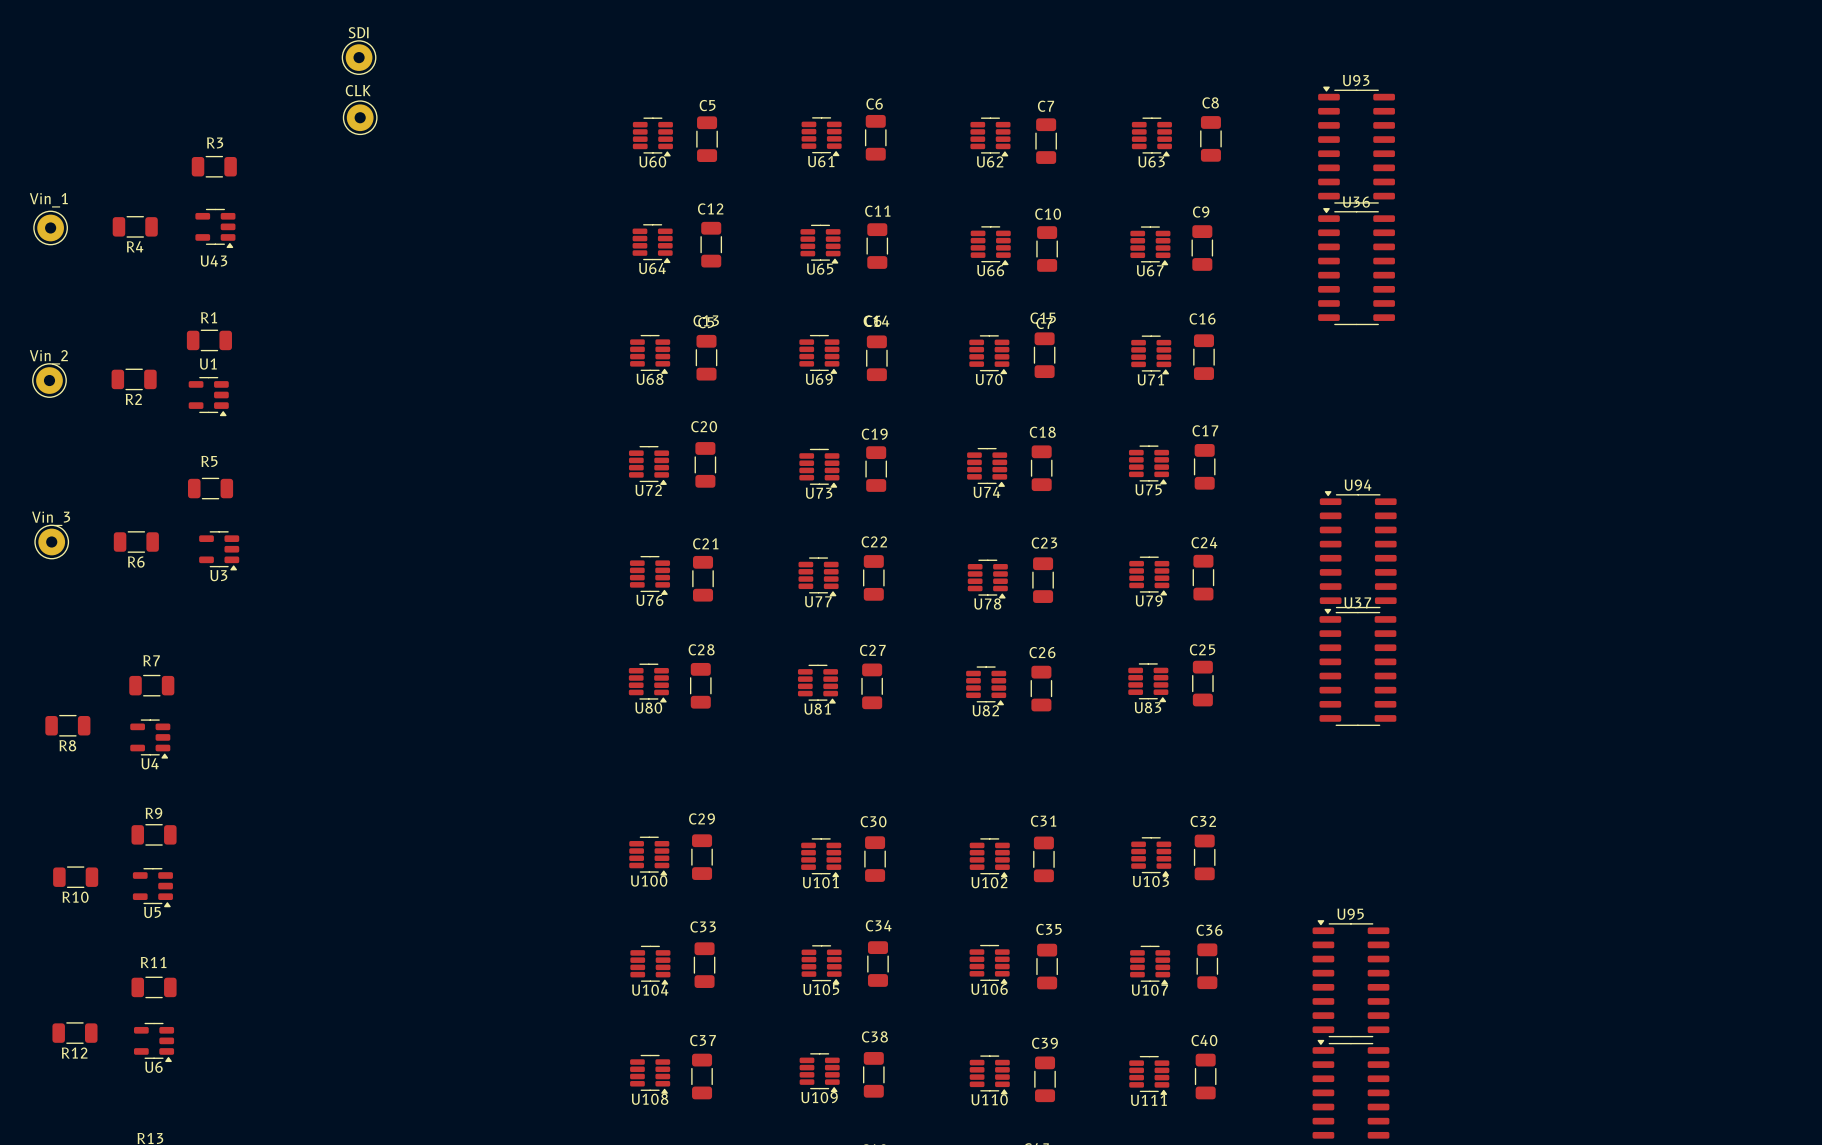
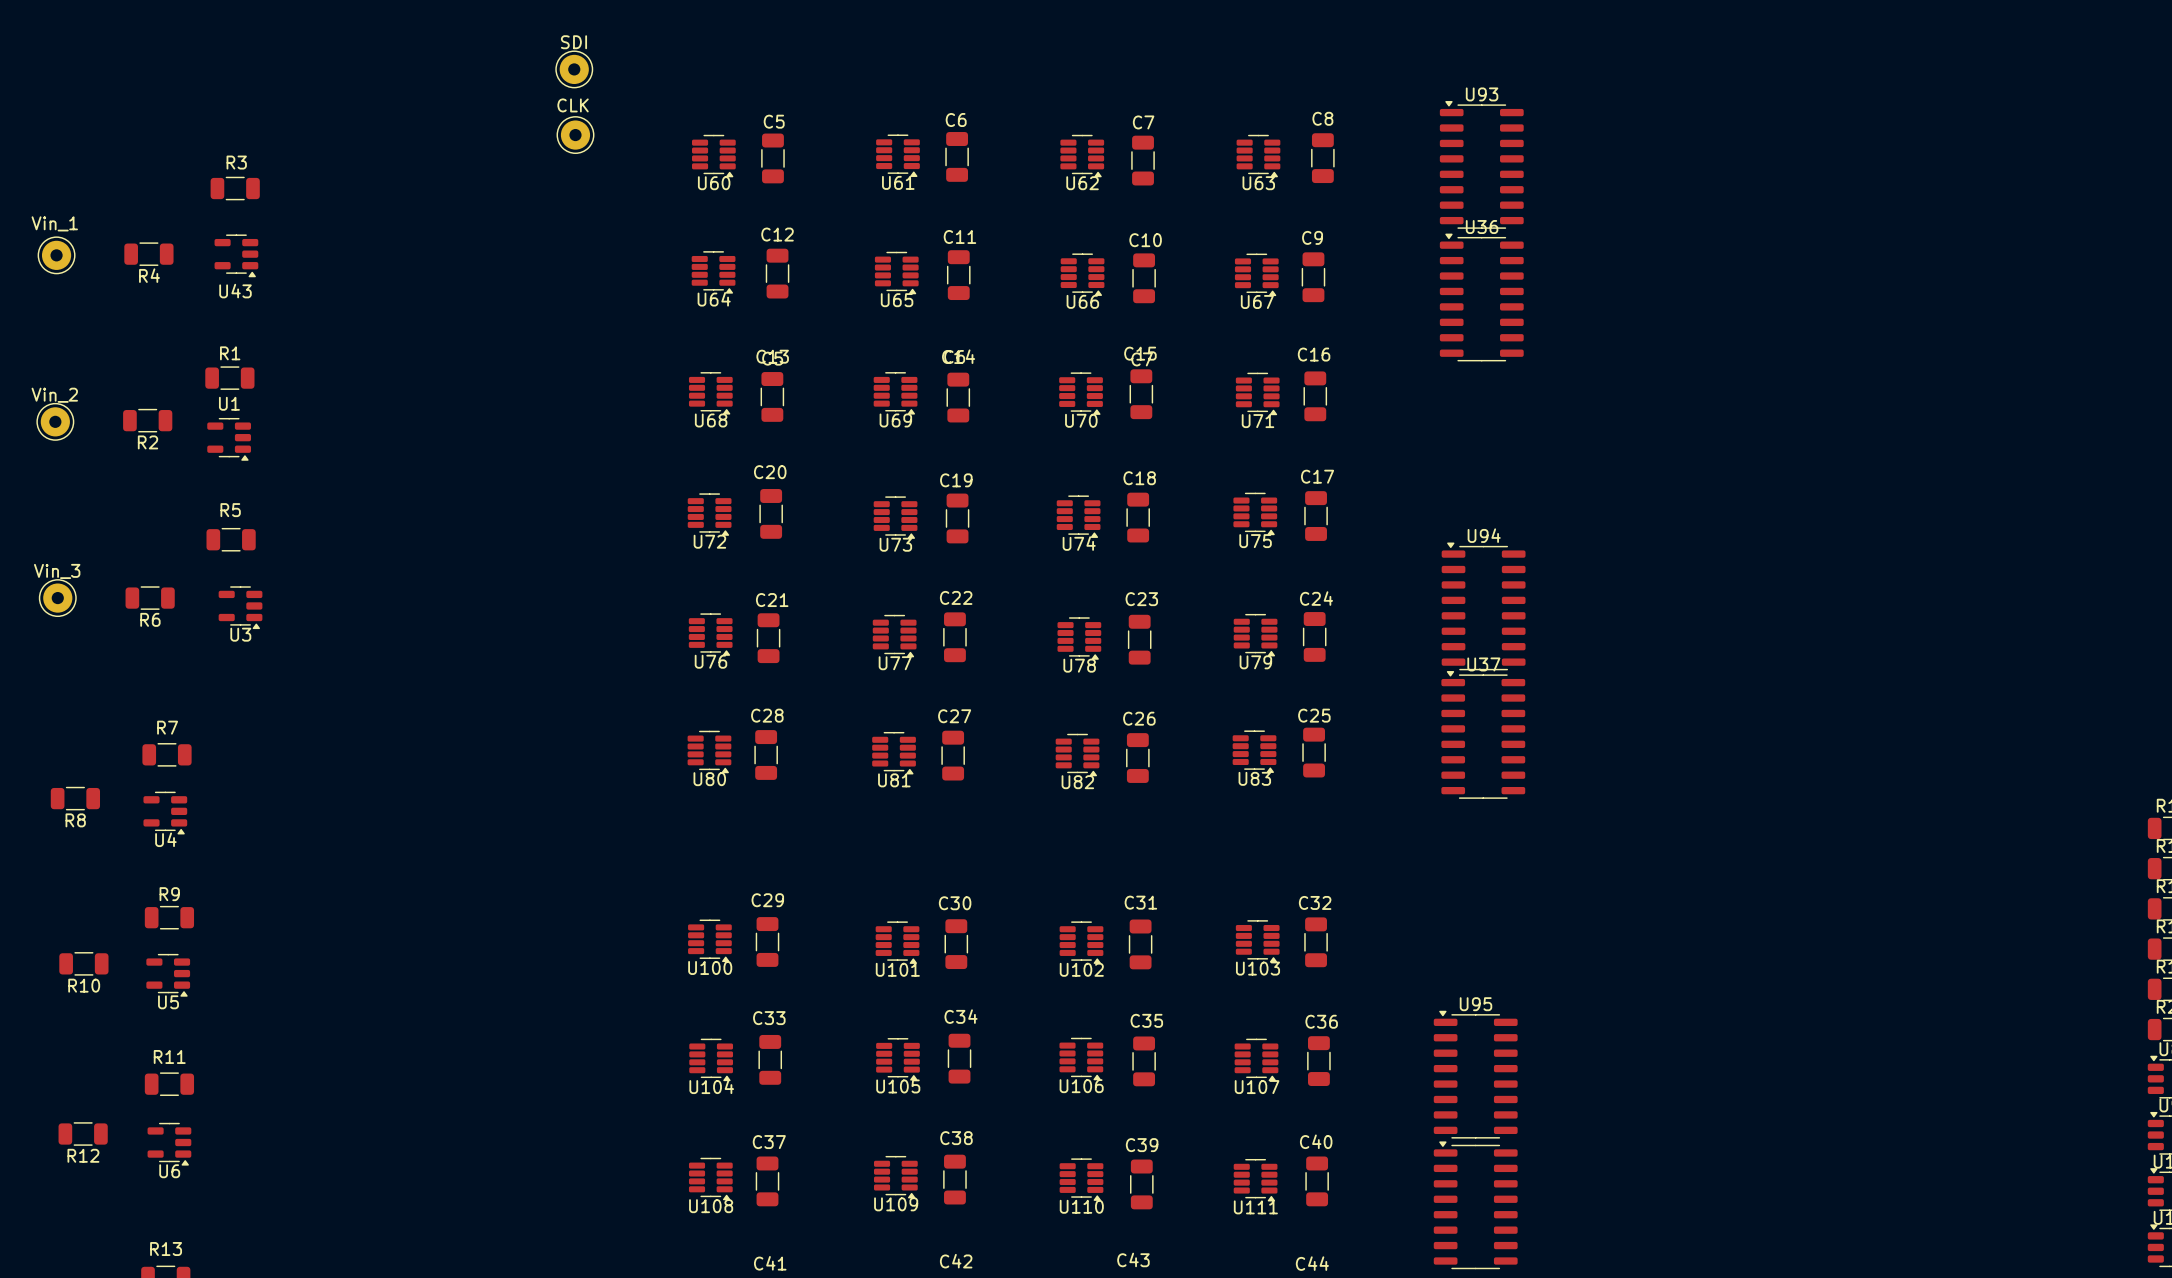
SDI position: (359, 57) -> (574, 69)
CLK position: (360, 117) -> (575, 135)

